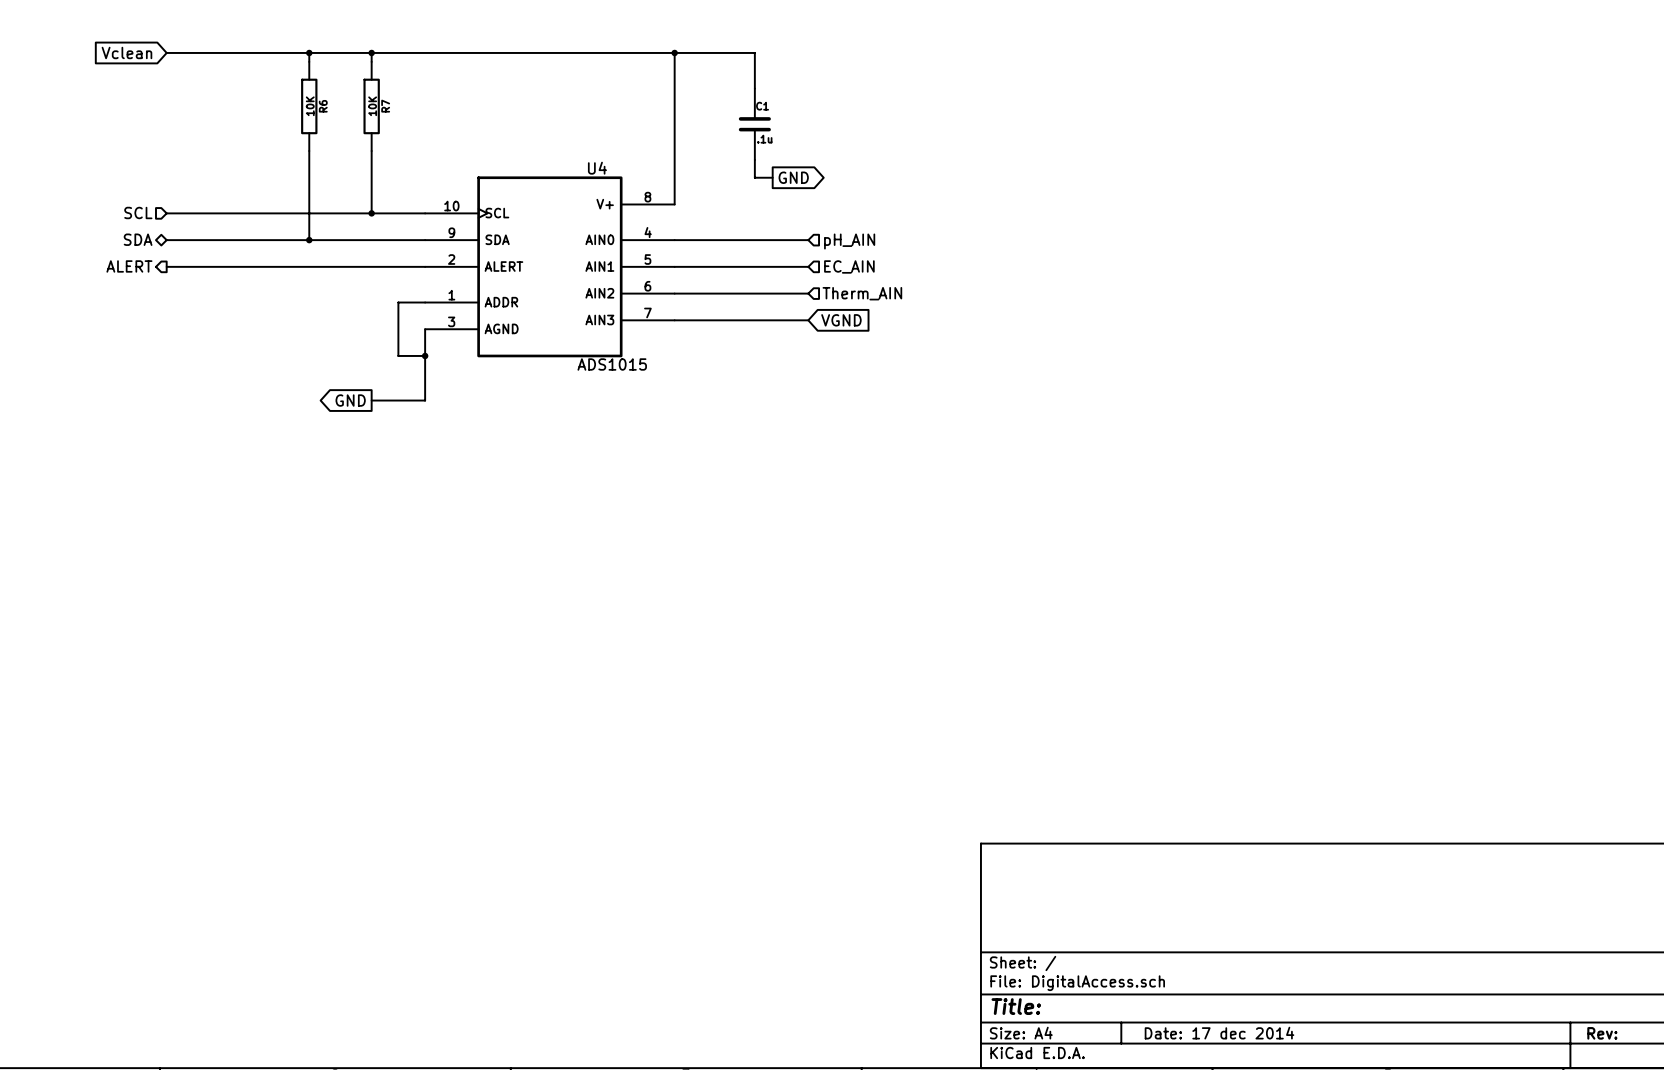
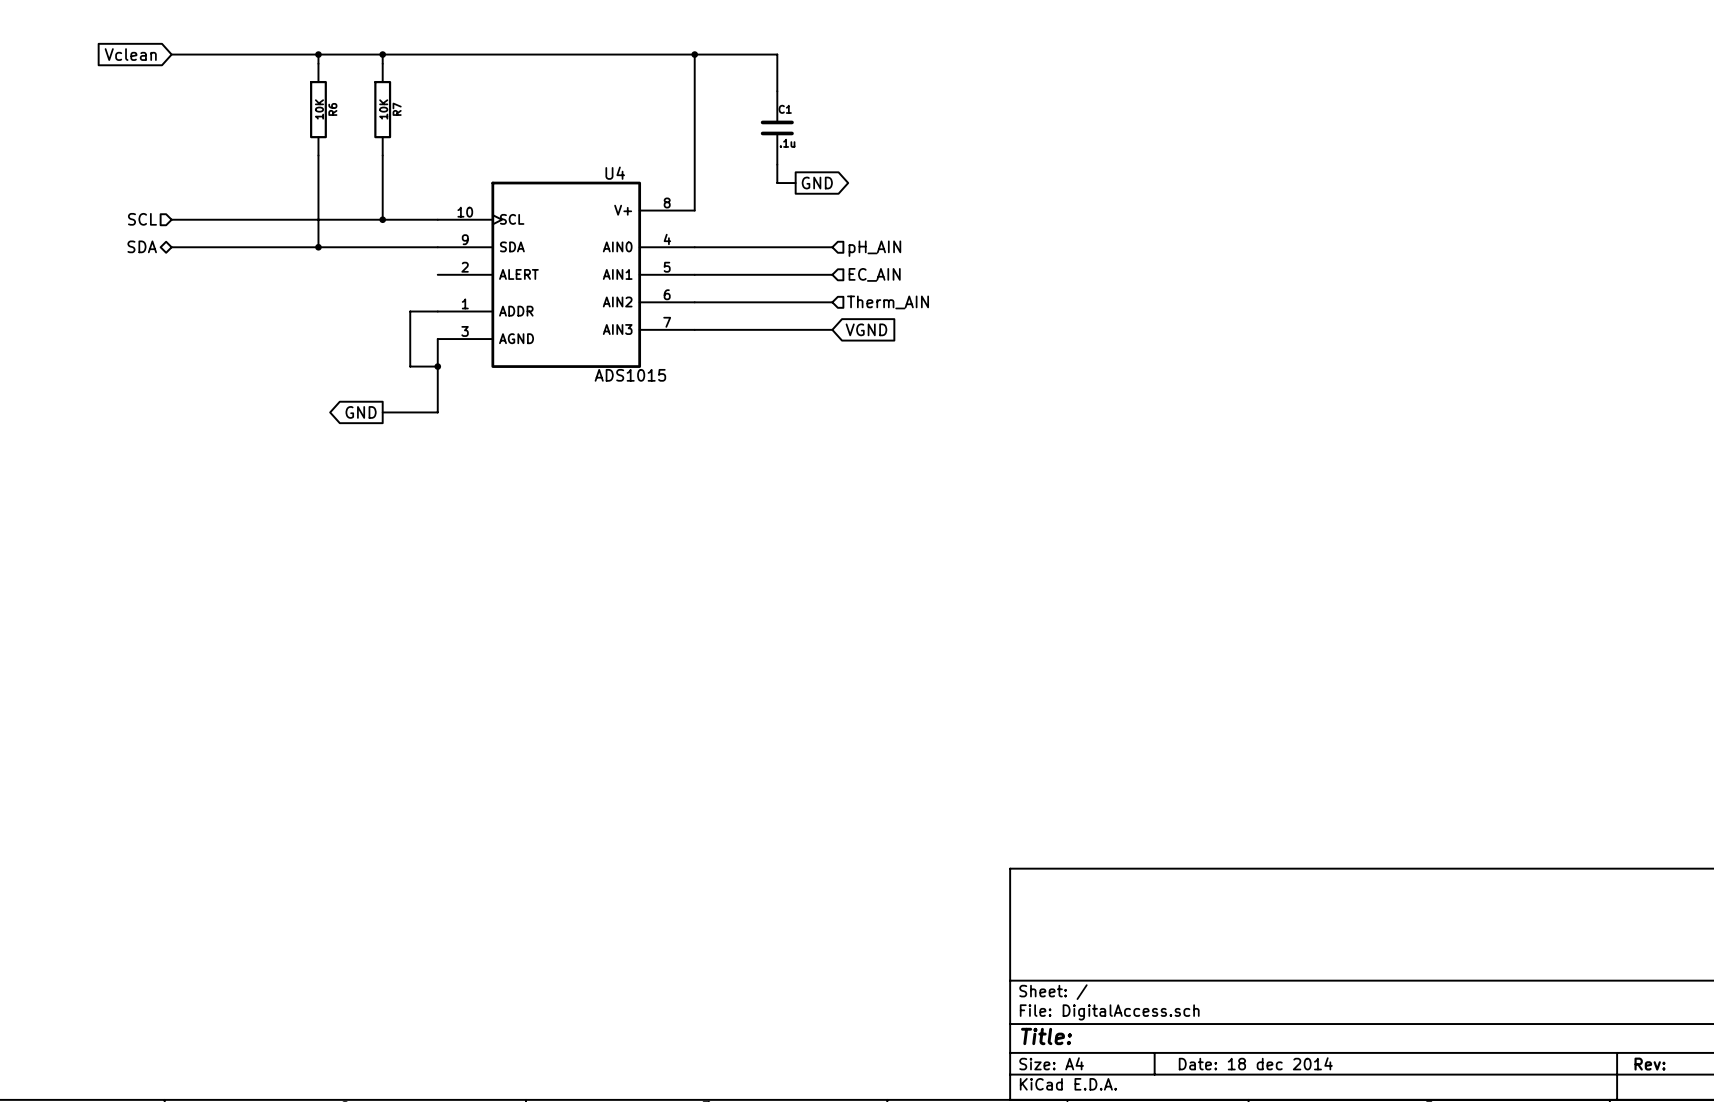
hierarchical label: ALERT (129, 266) -> none
wire: (166, 266) (425, 266) -> none
title block: Date: 17 dec 2014 (1219, 1033) -> Date: 18 dec 2014 (1255, 1063)

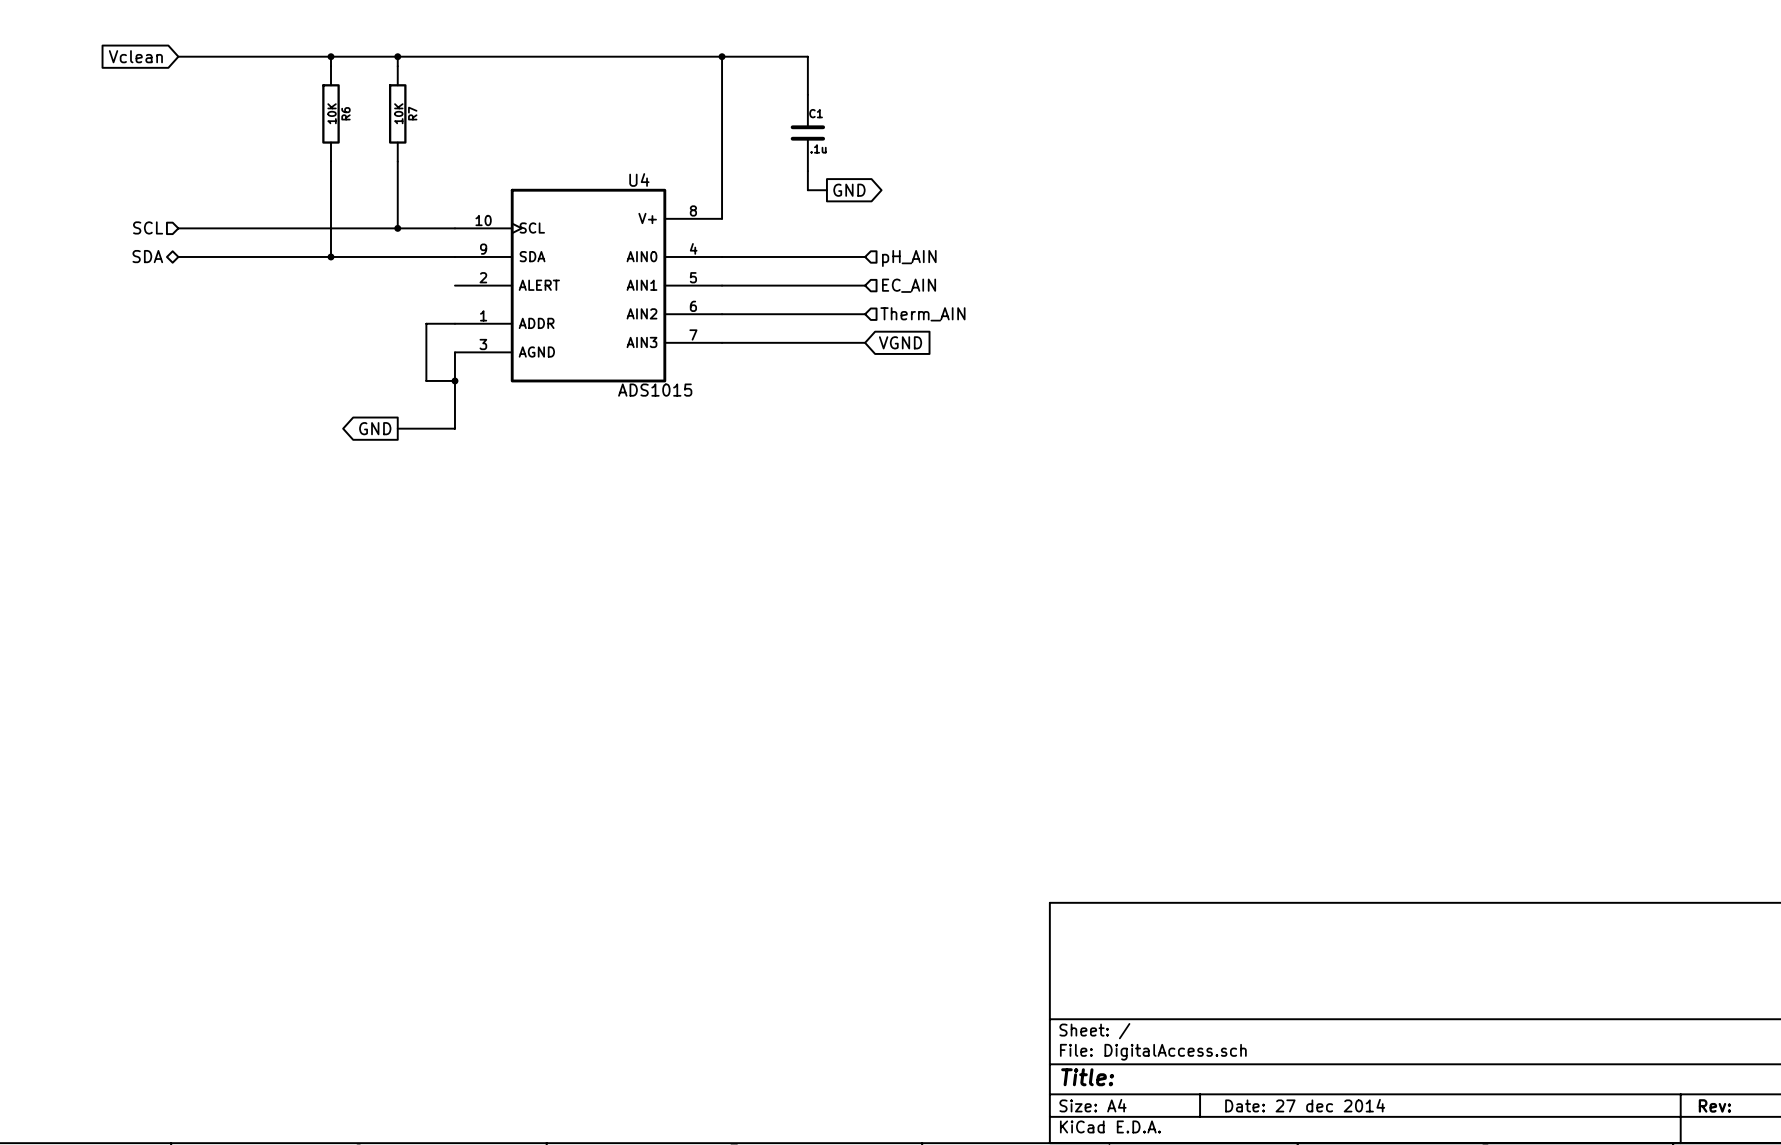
title block: Date: 18 dec 2014 (1255, 1063) -> Date: 27 dec 2014 (1305, 1105)

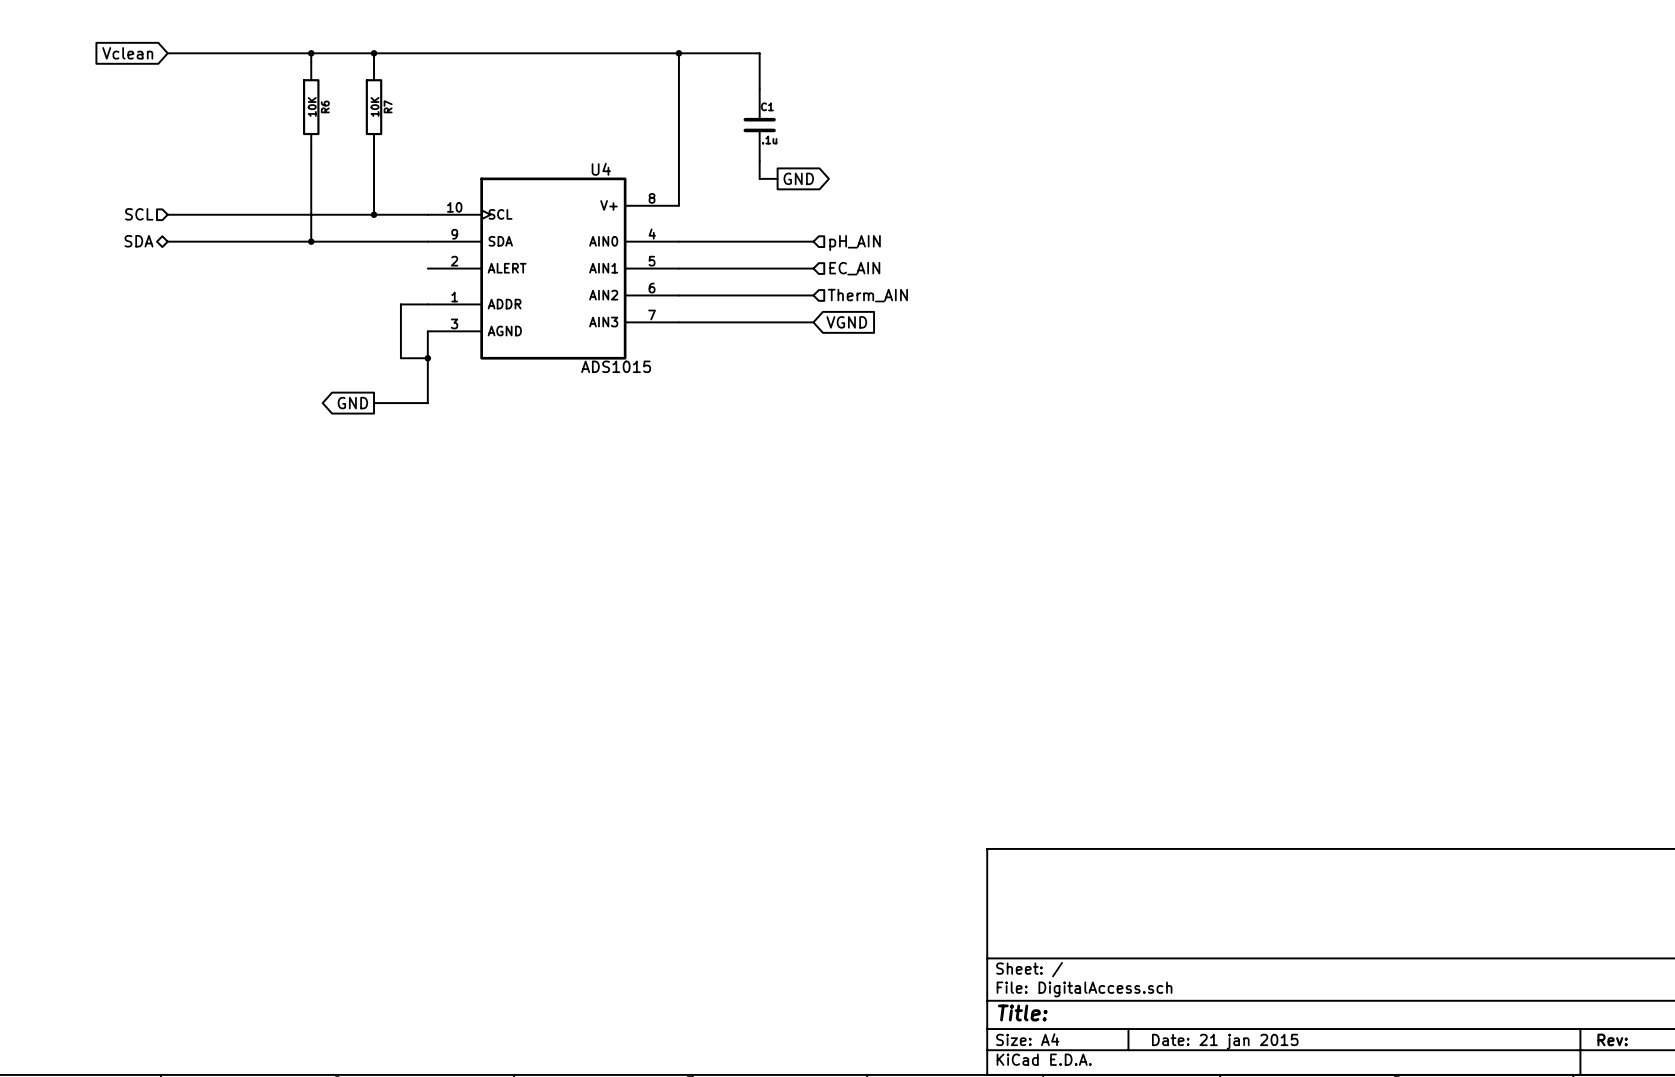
title block: Date: 27 dec 2014 (1305, 1105) -> Date: 21 jan 2015 (1225, 1041)

